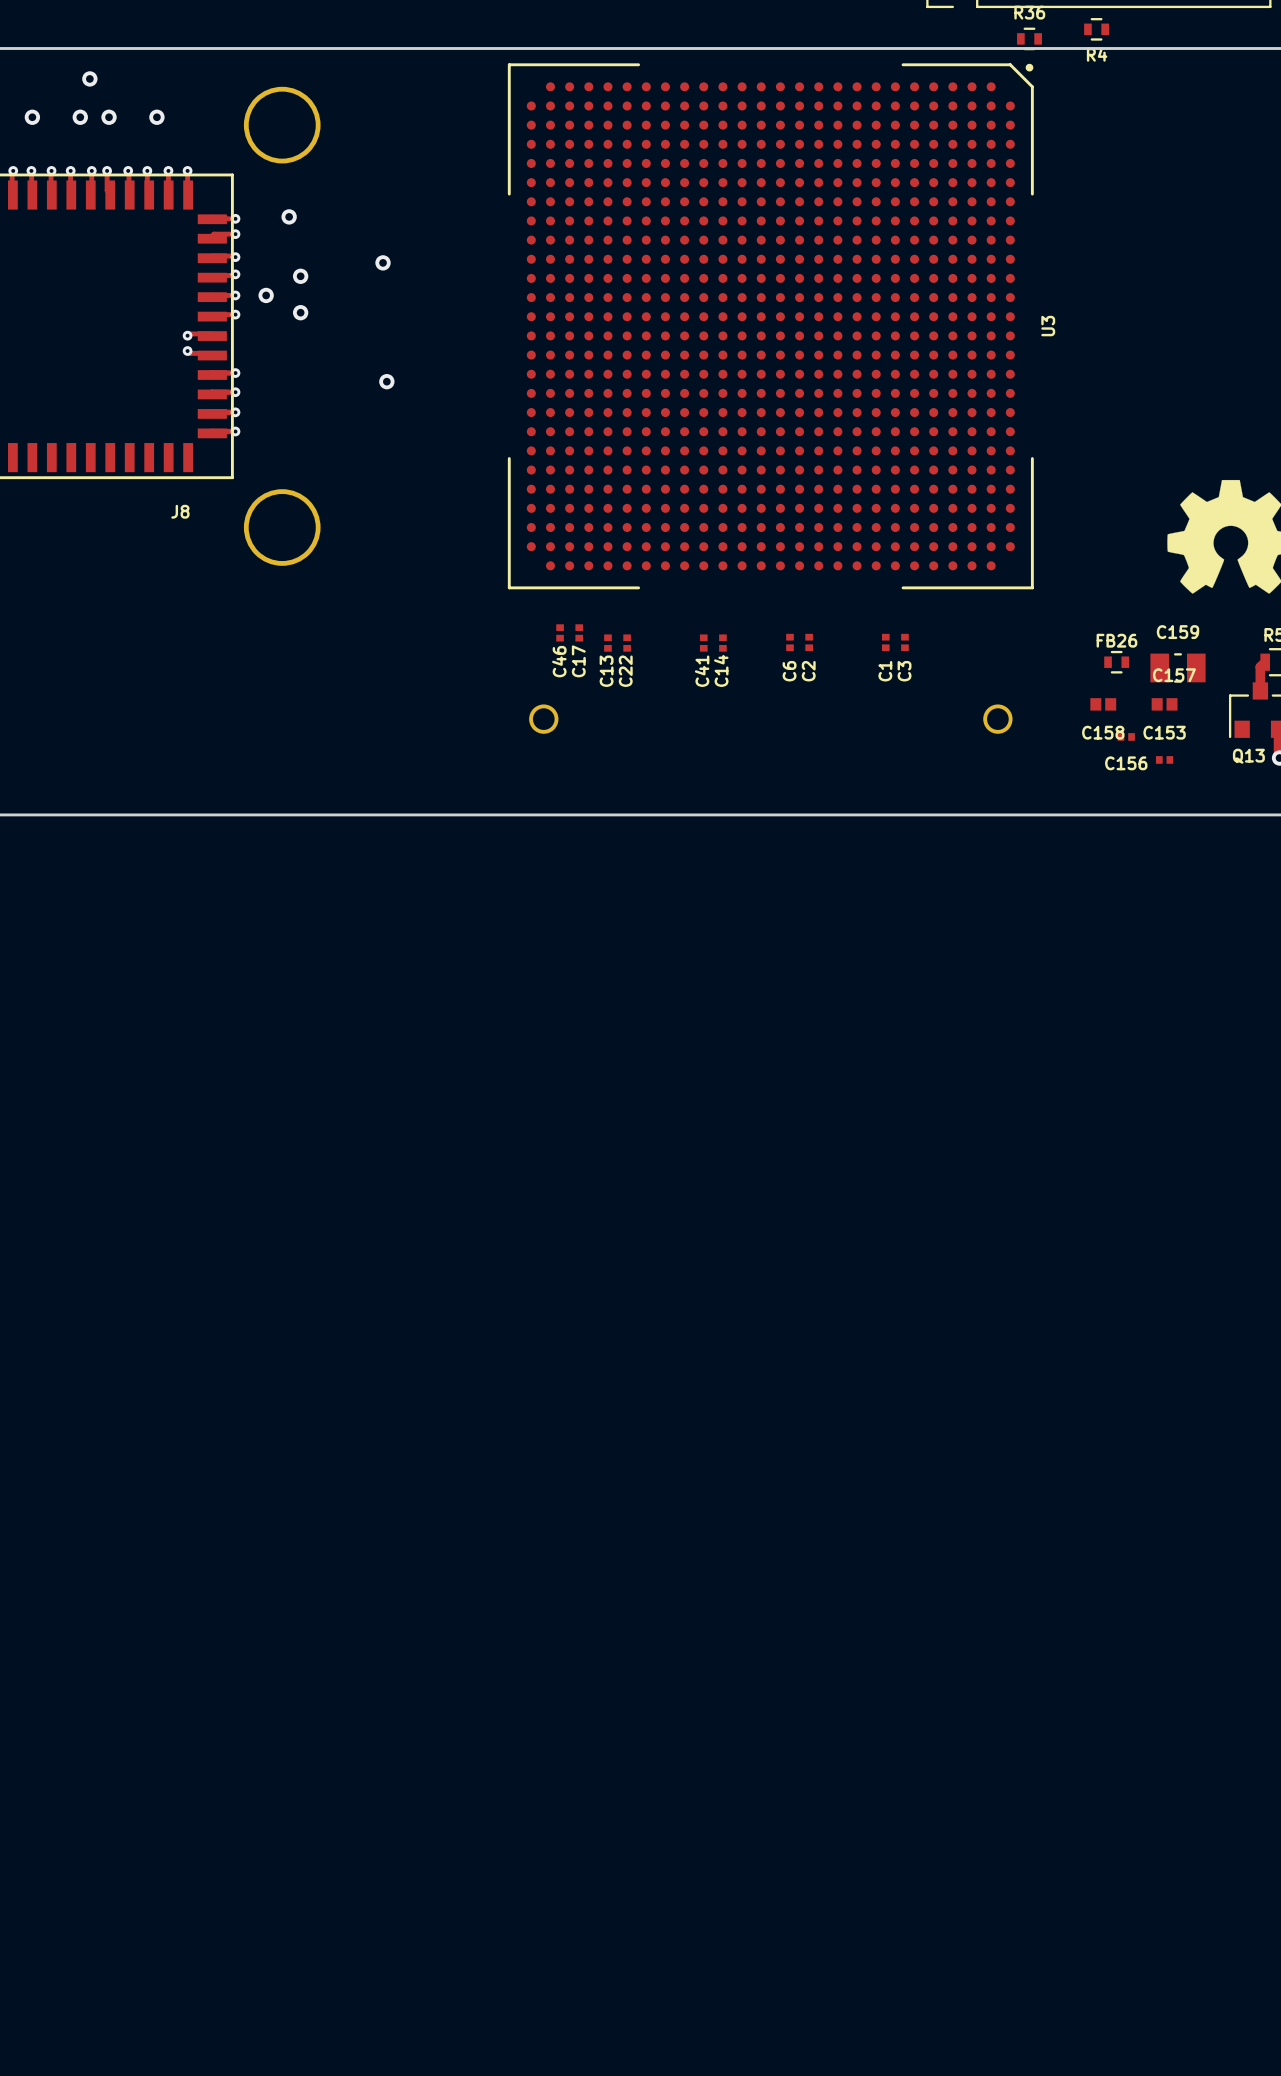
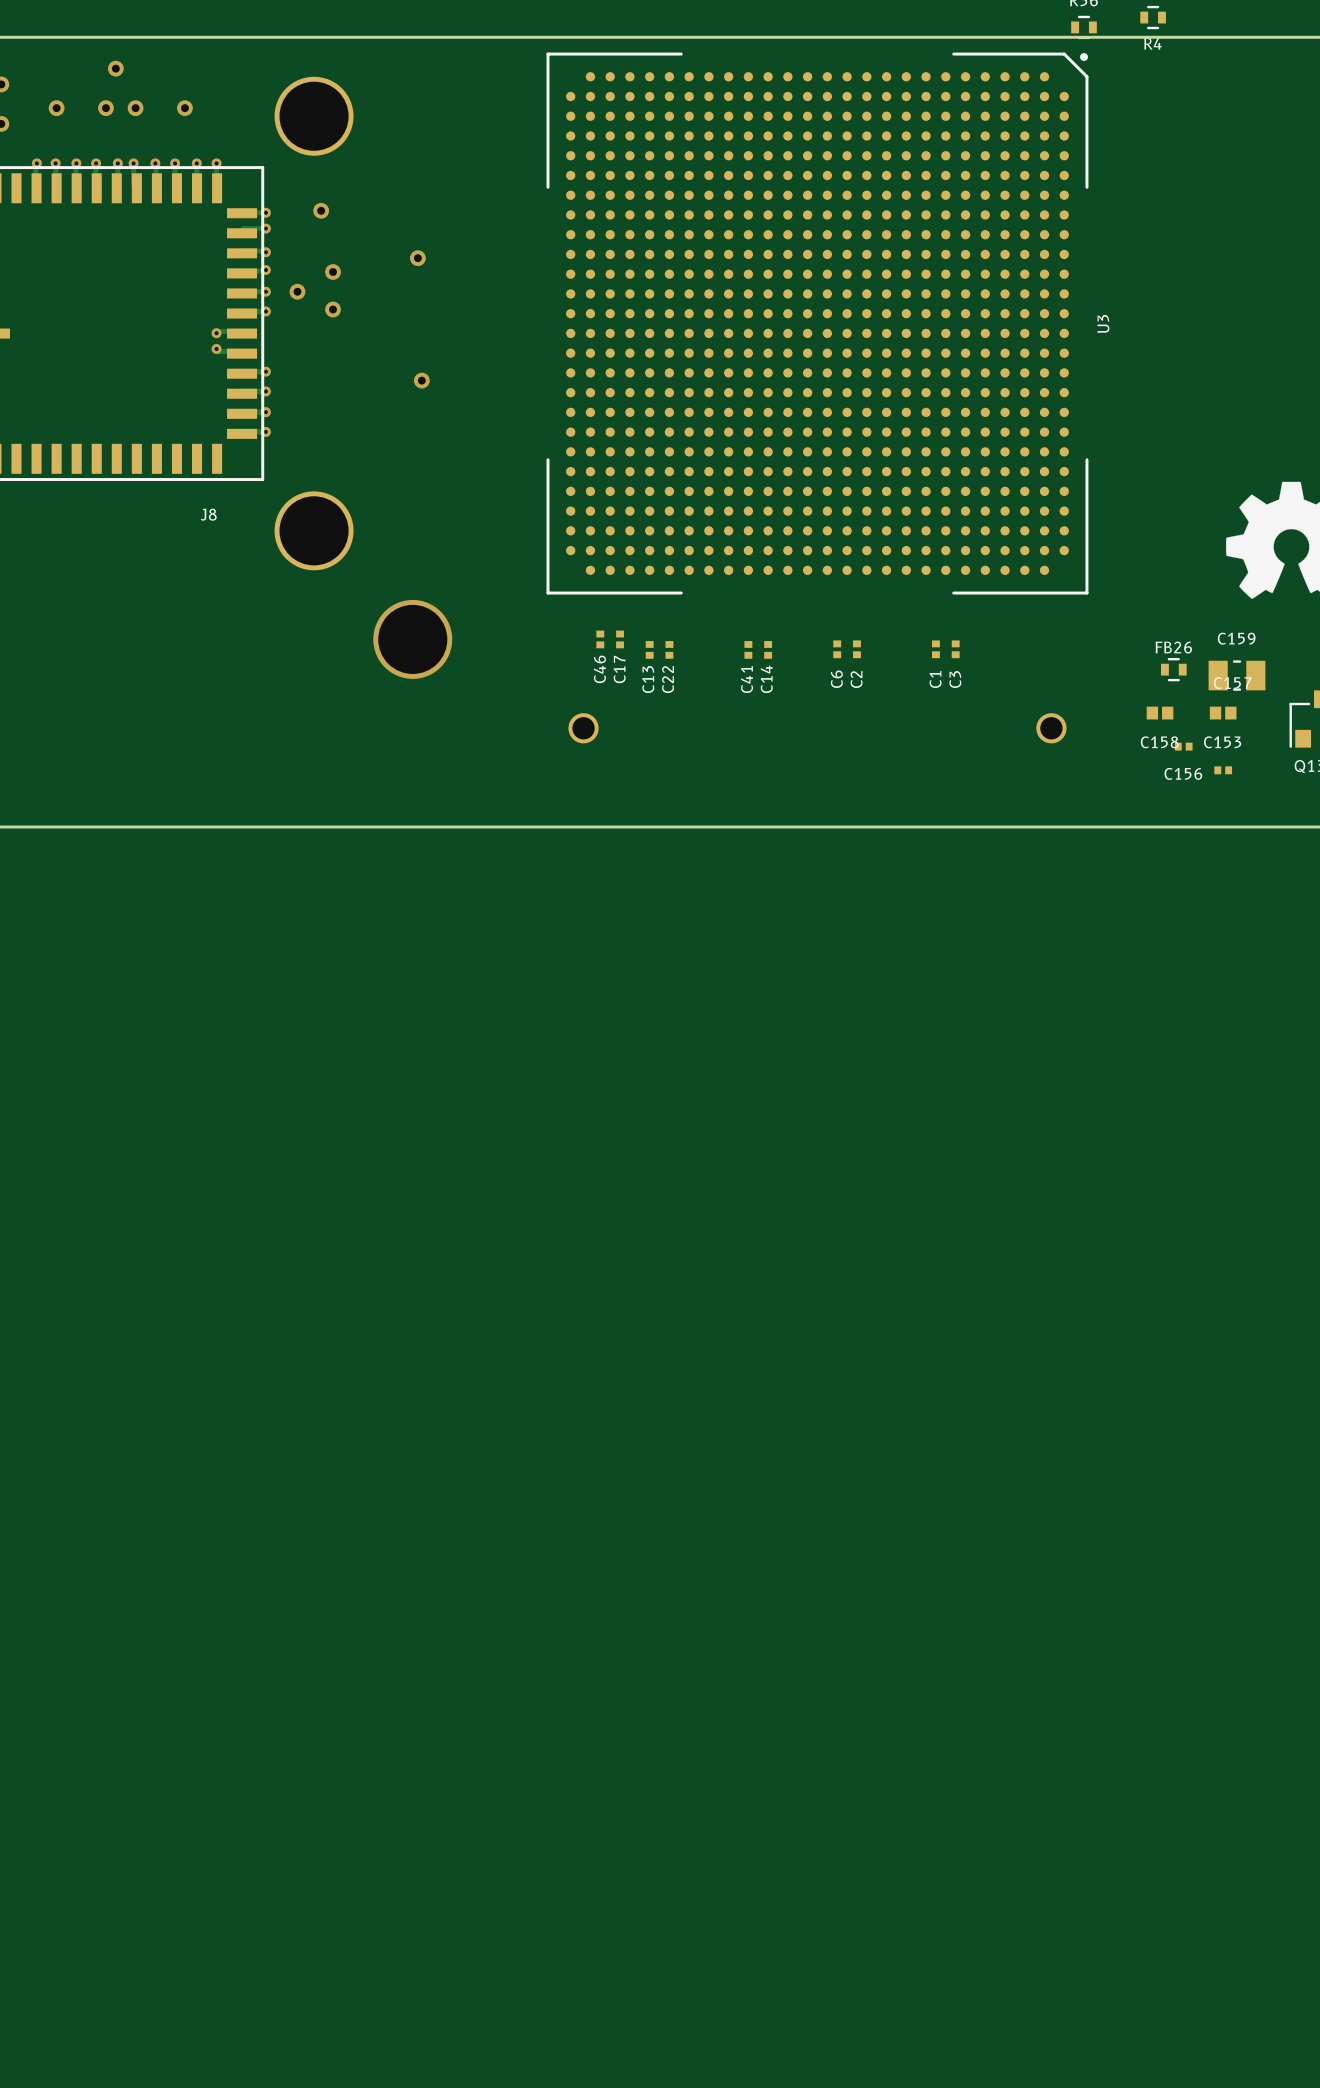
via: none -> (412, 639)

